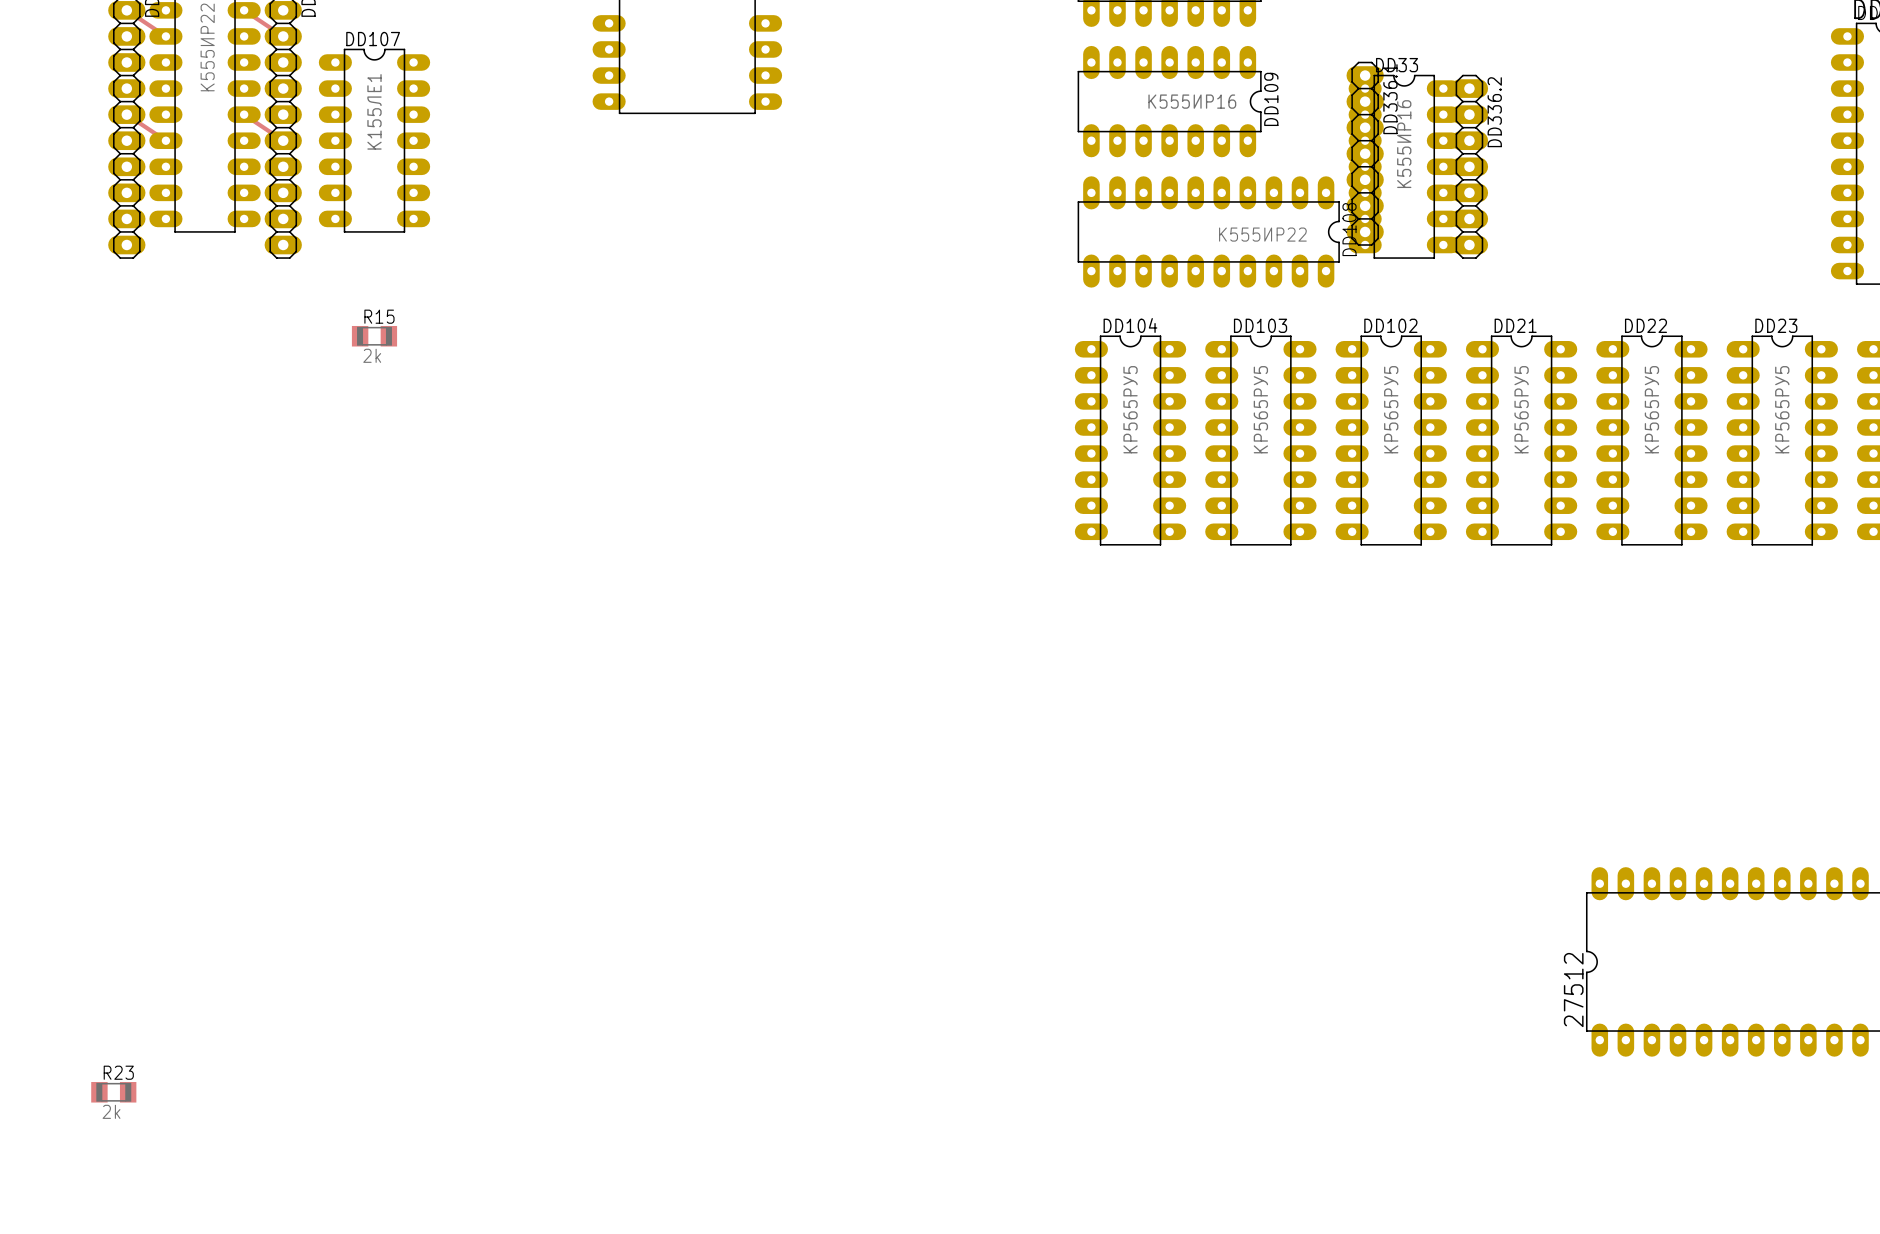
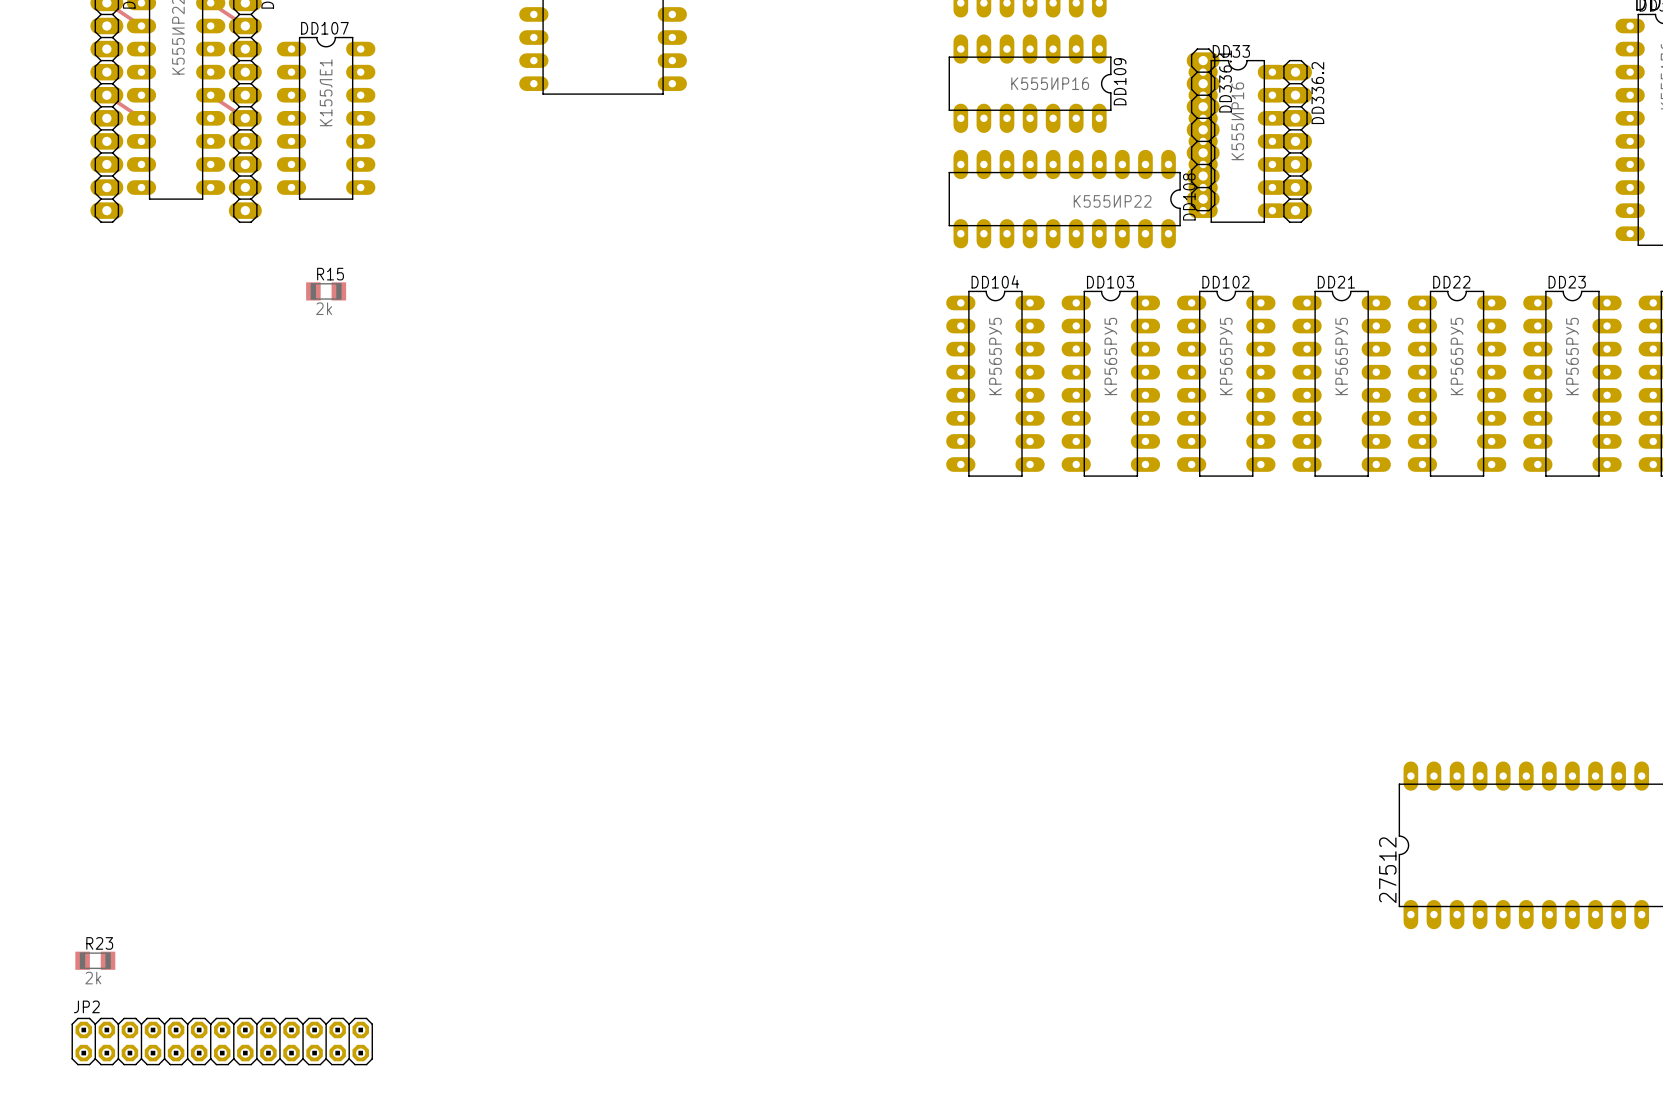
JP2: none -> (222, 1041)

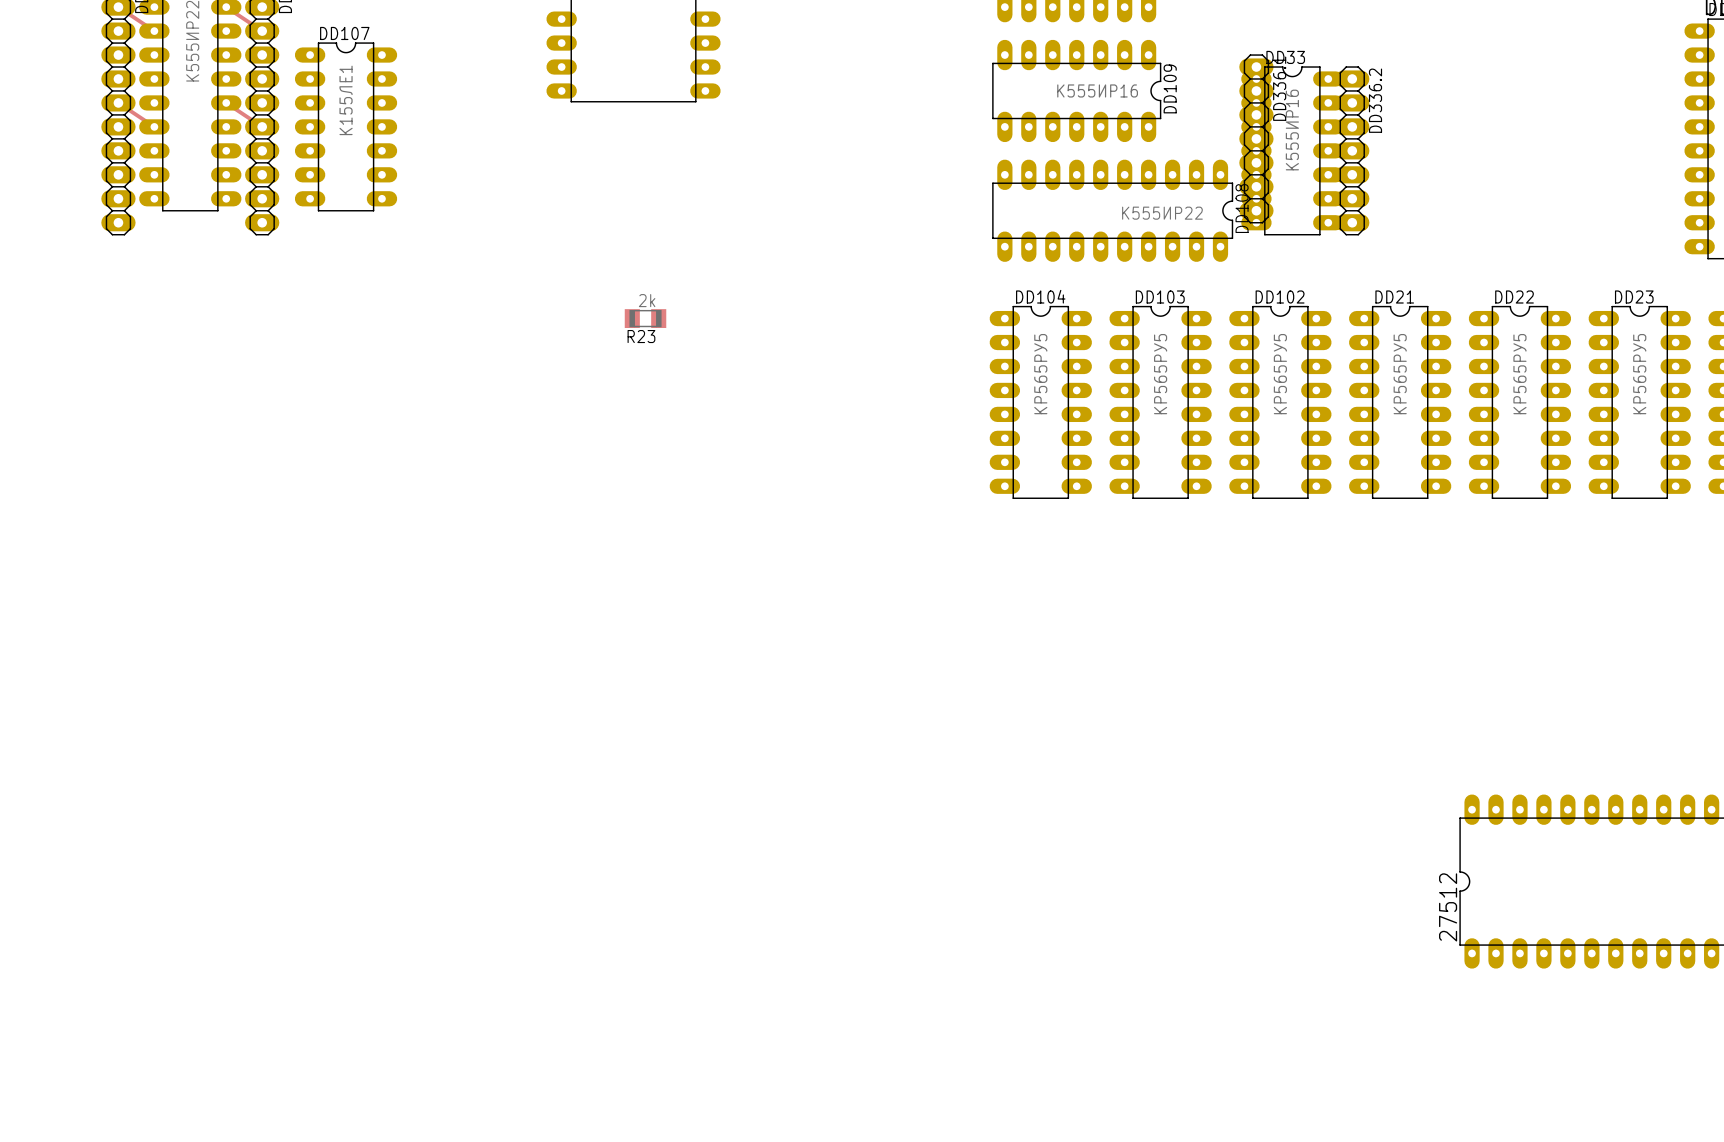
R15: 2k (326, 291) -> none
R23 name position: R23 (99, 943) -> R23 (641, 336)
R23 position: (95, 960) -> (645, 318)
R23 value position: 2k (93, 978) -> 2k (647, 300)
JP2: (222, 1041) -> none

